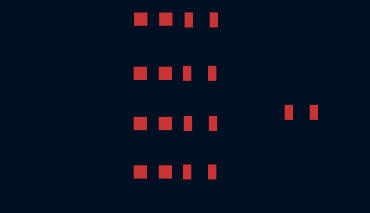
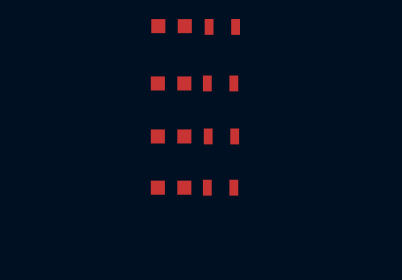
part: (301, 112) -> none

